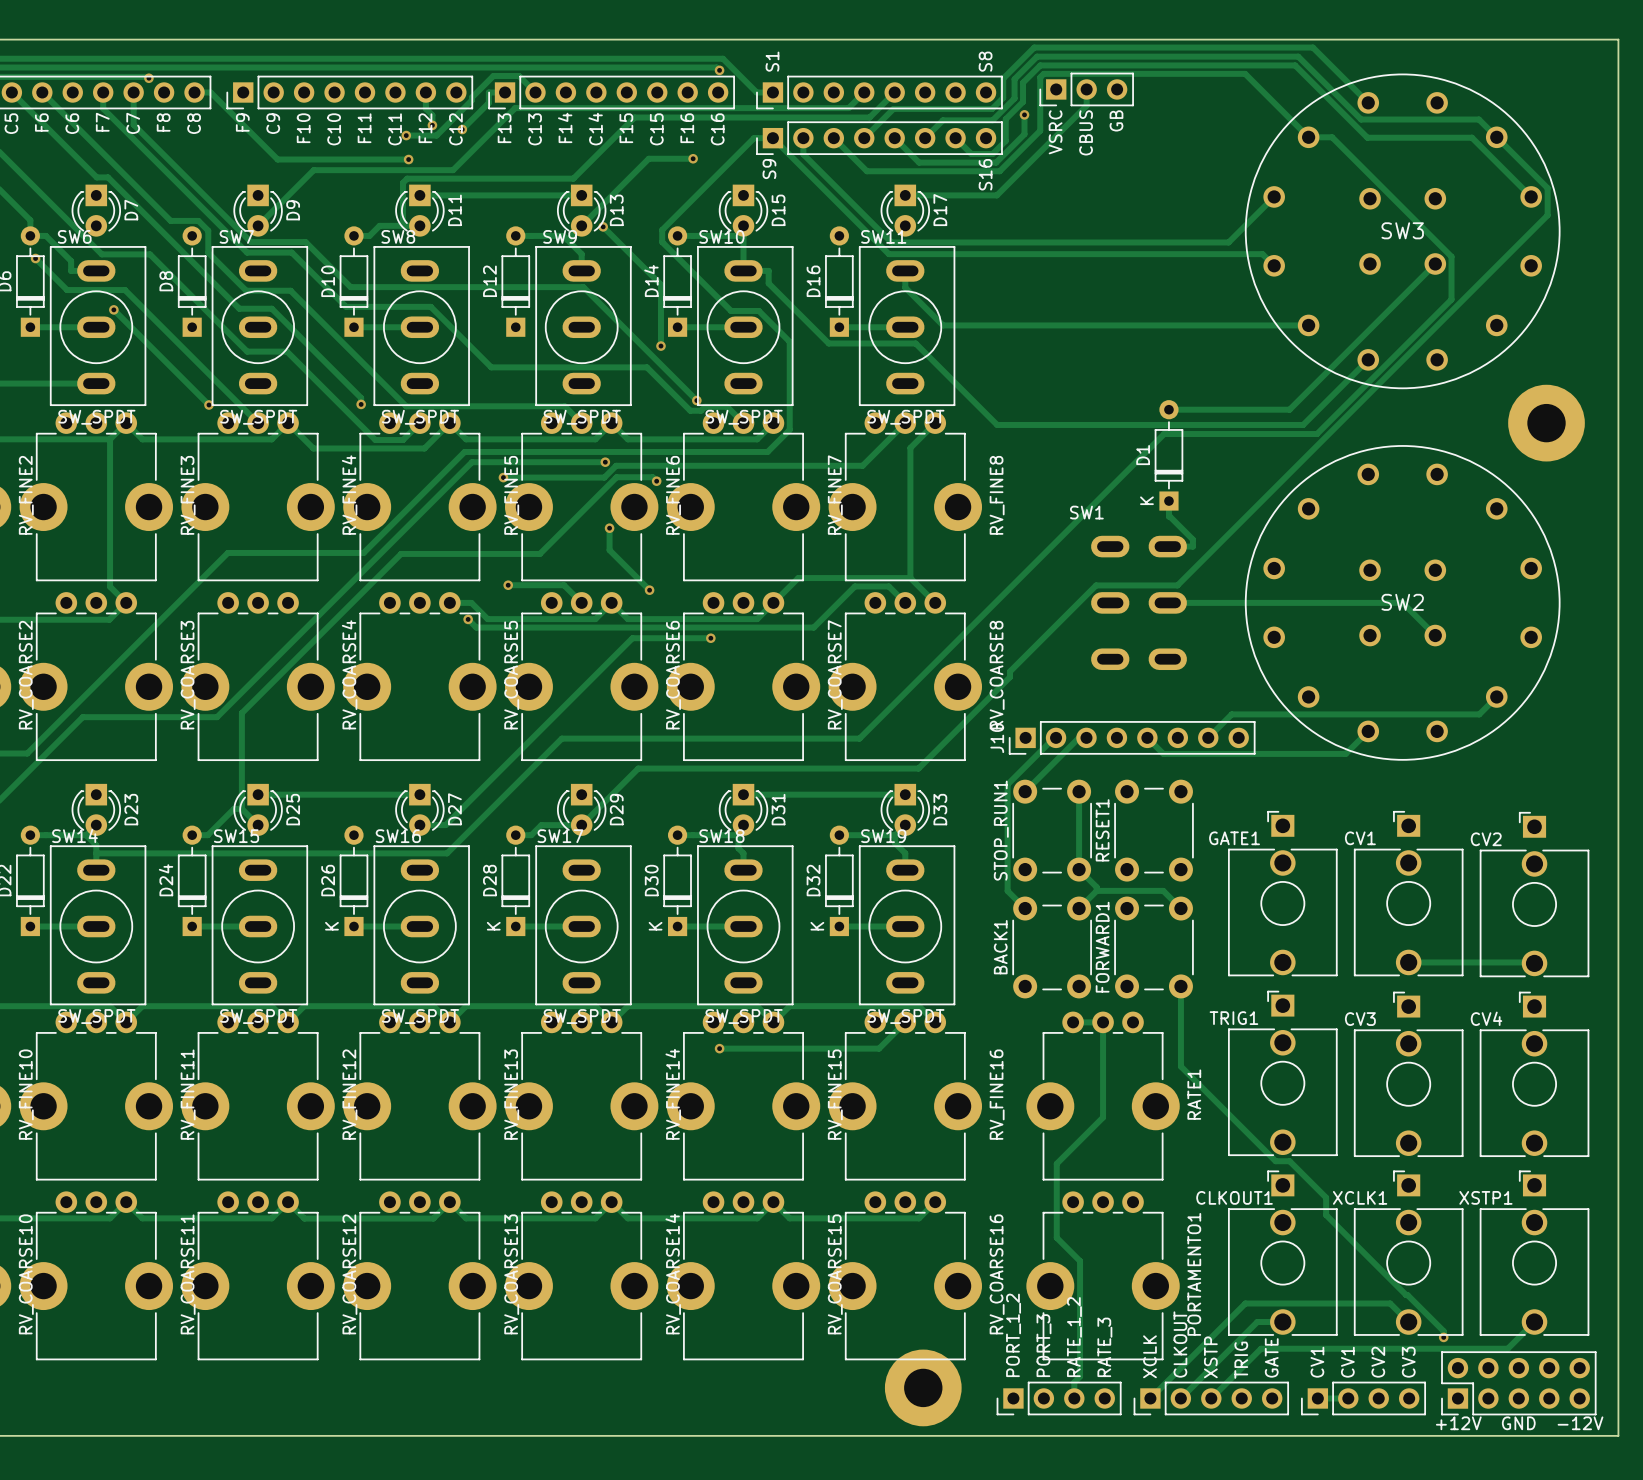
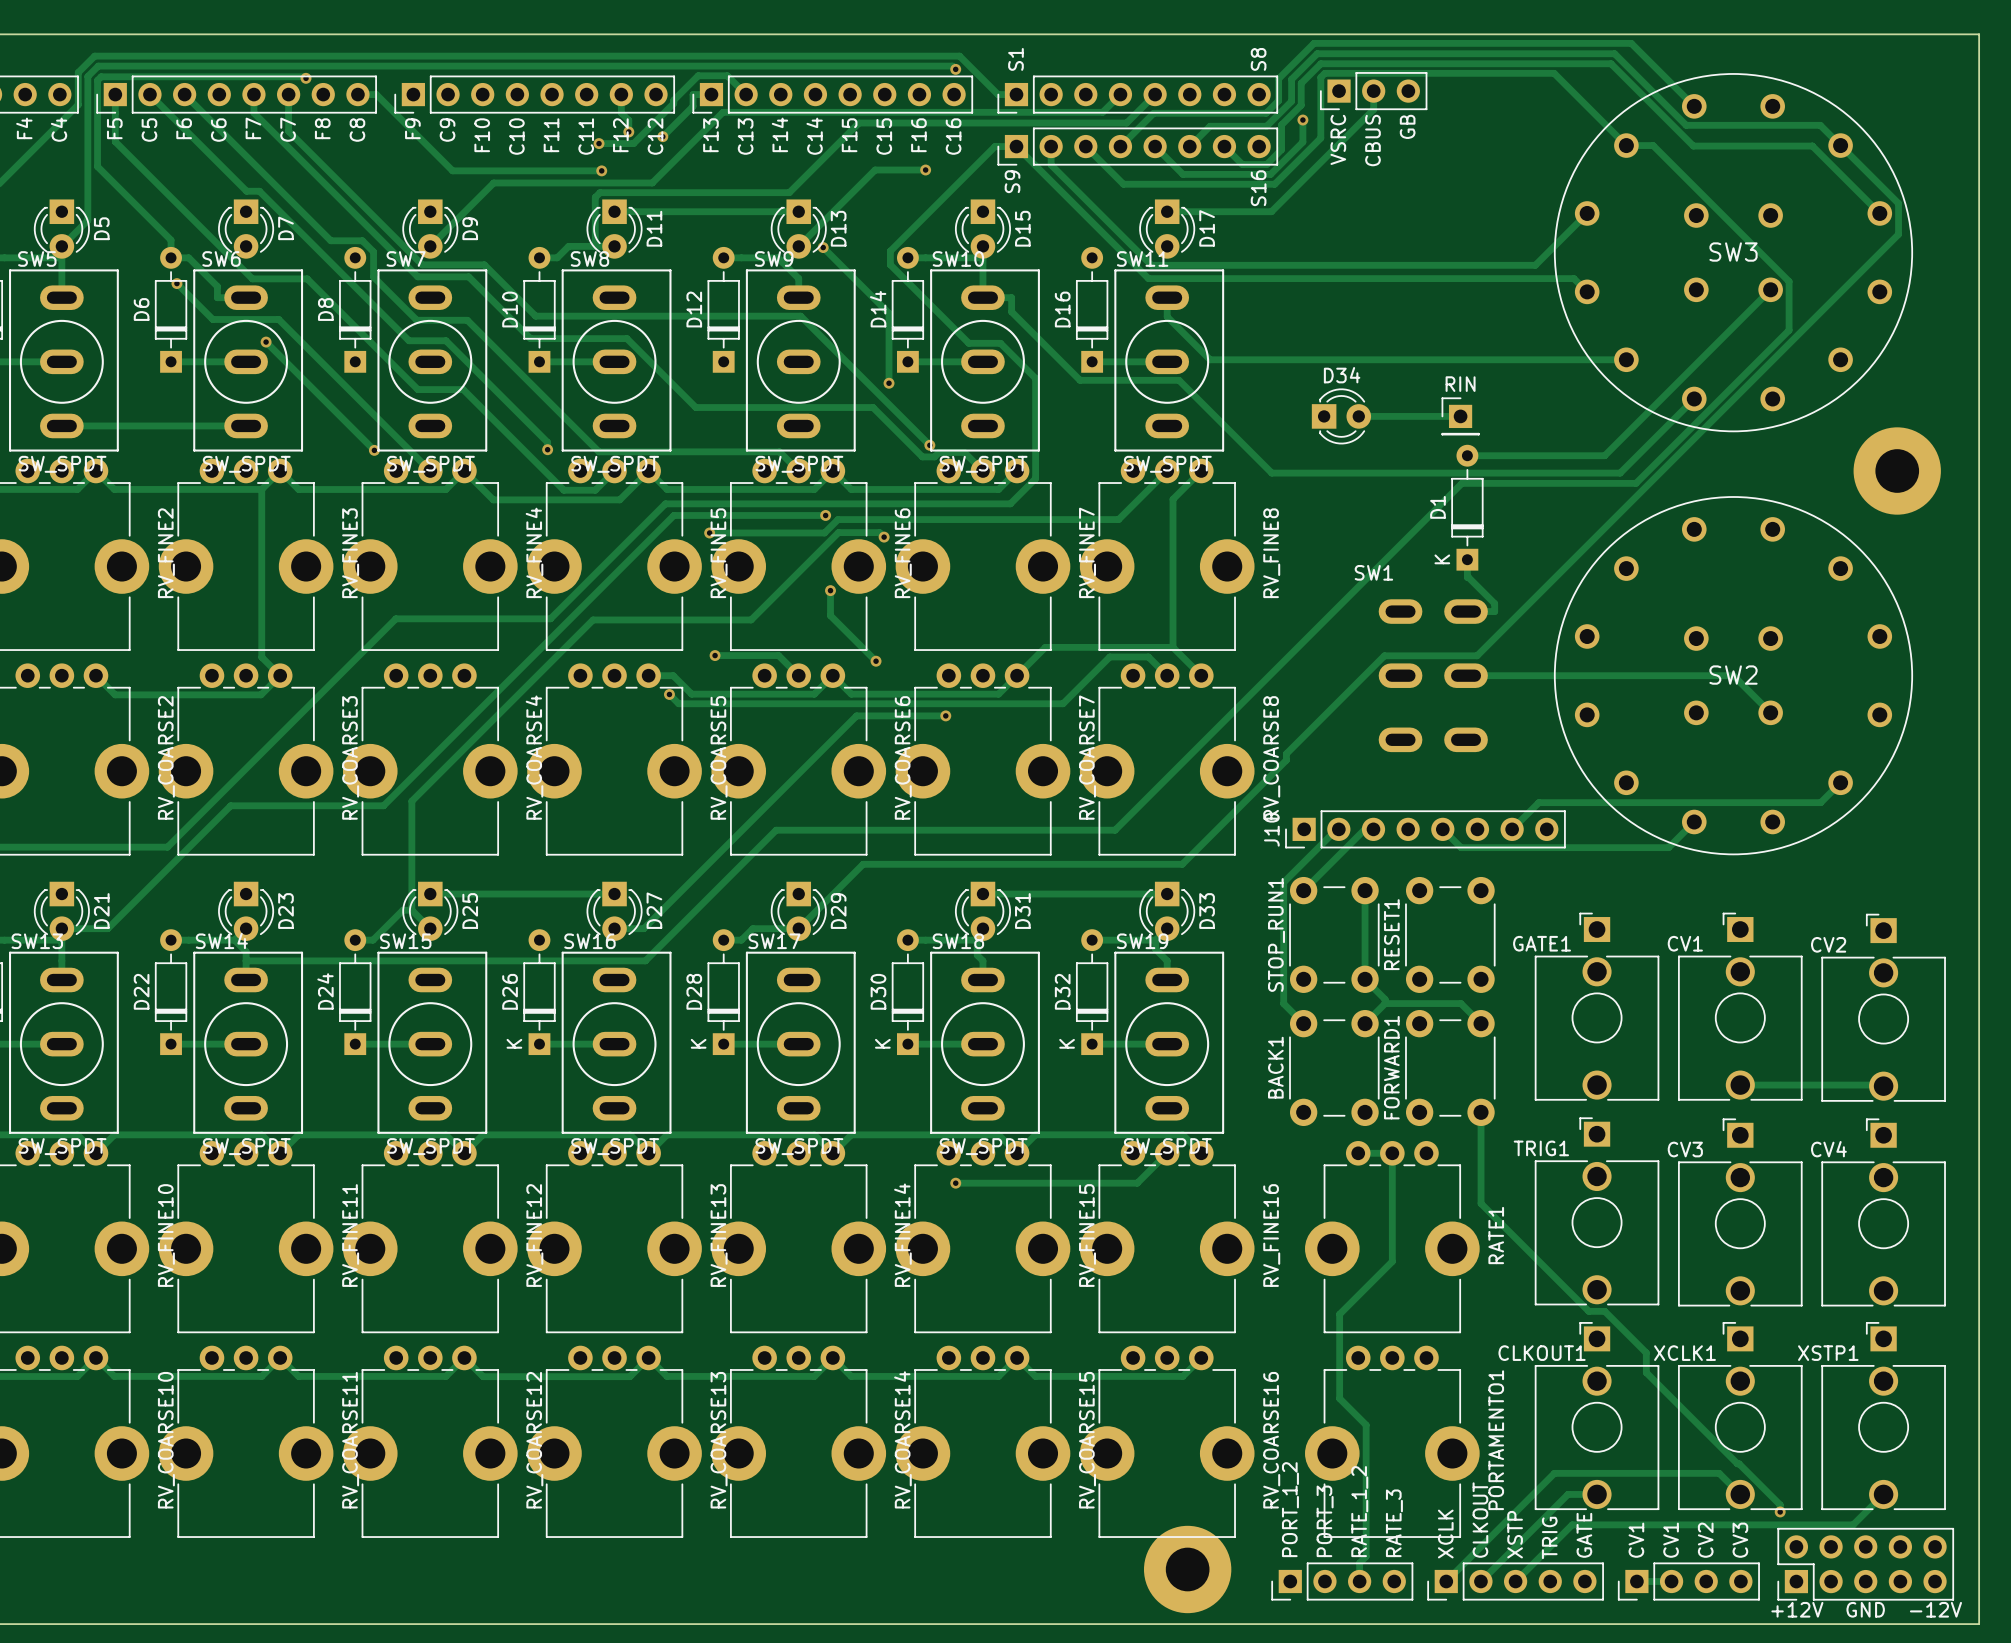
D34: none -> (1341, 416)
track: none -> (1358, 416) (1460, 416)
RIN: none -> (1460, 416)

